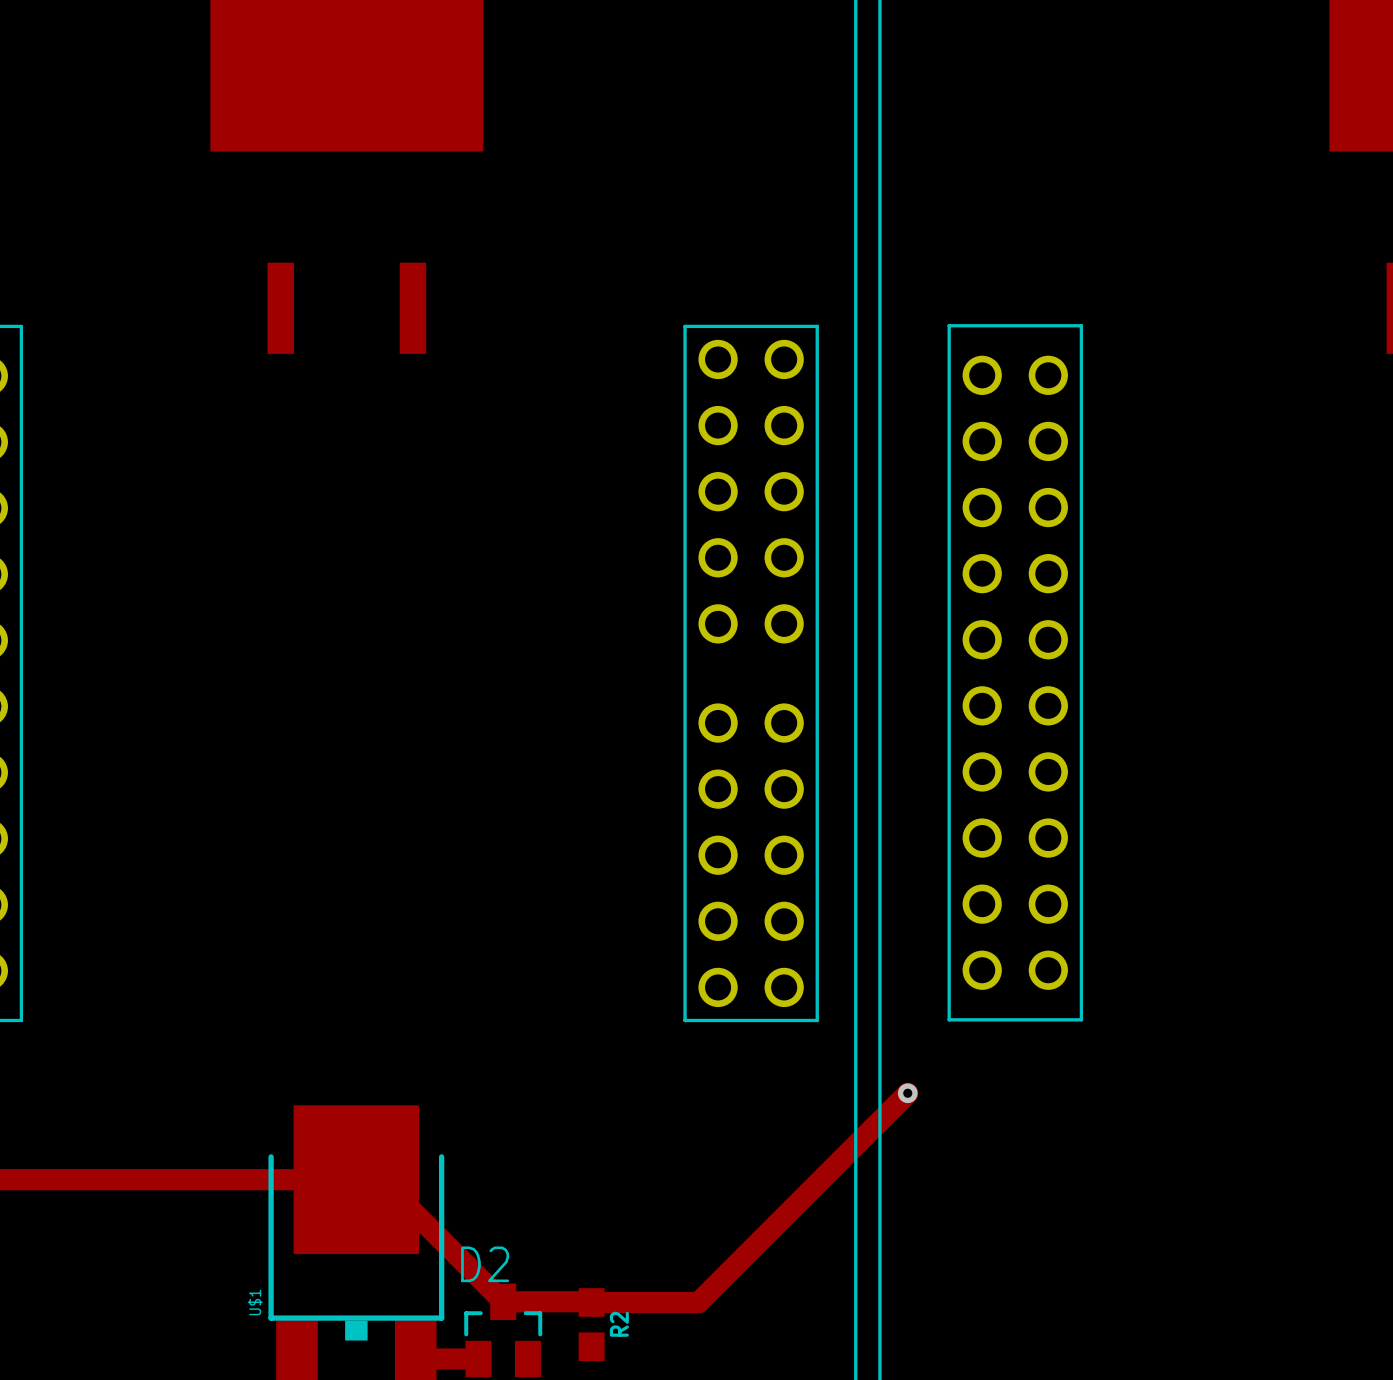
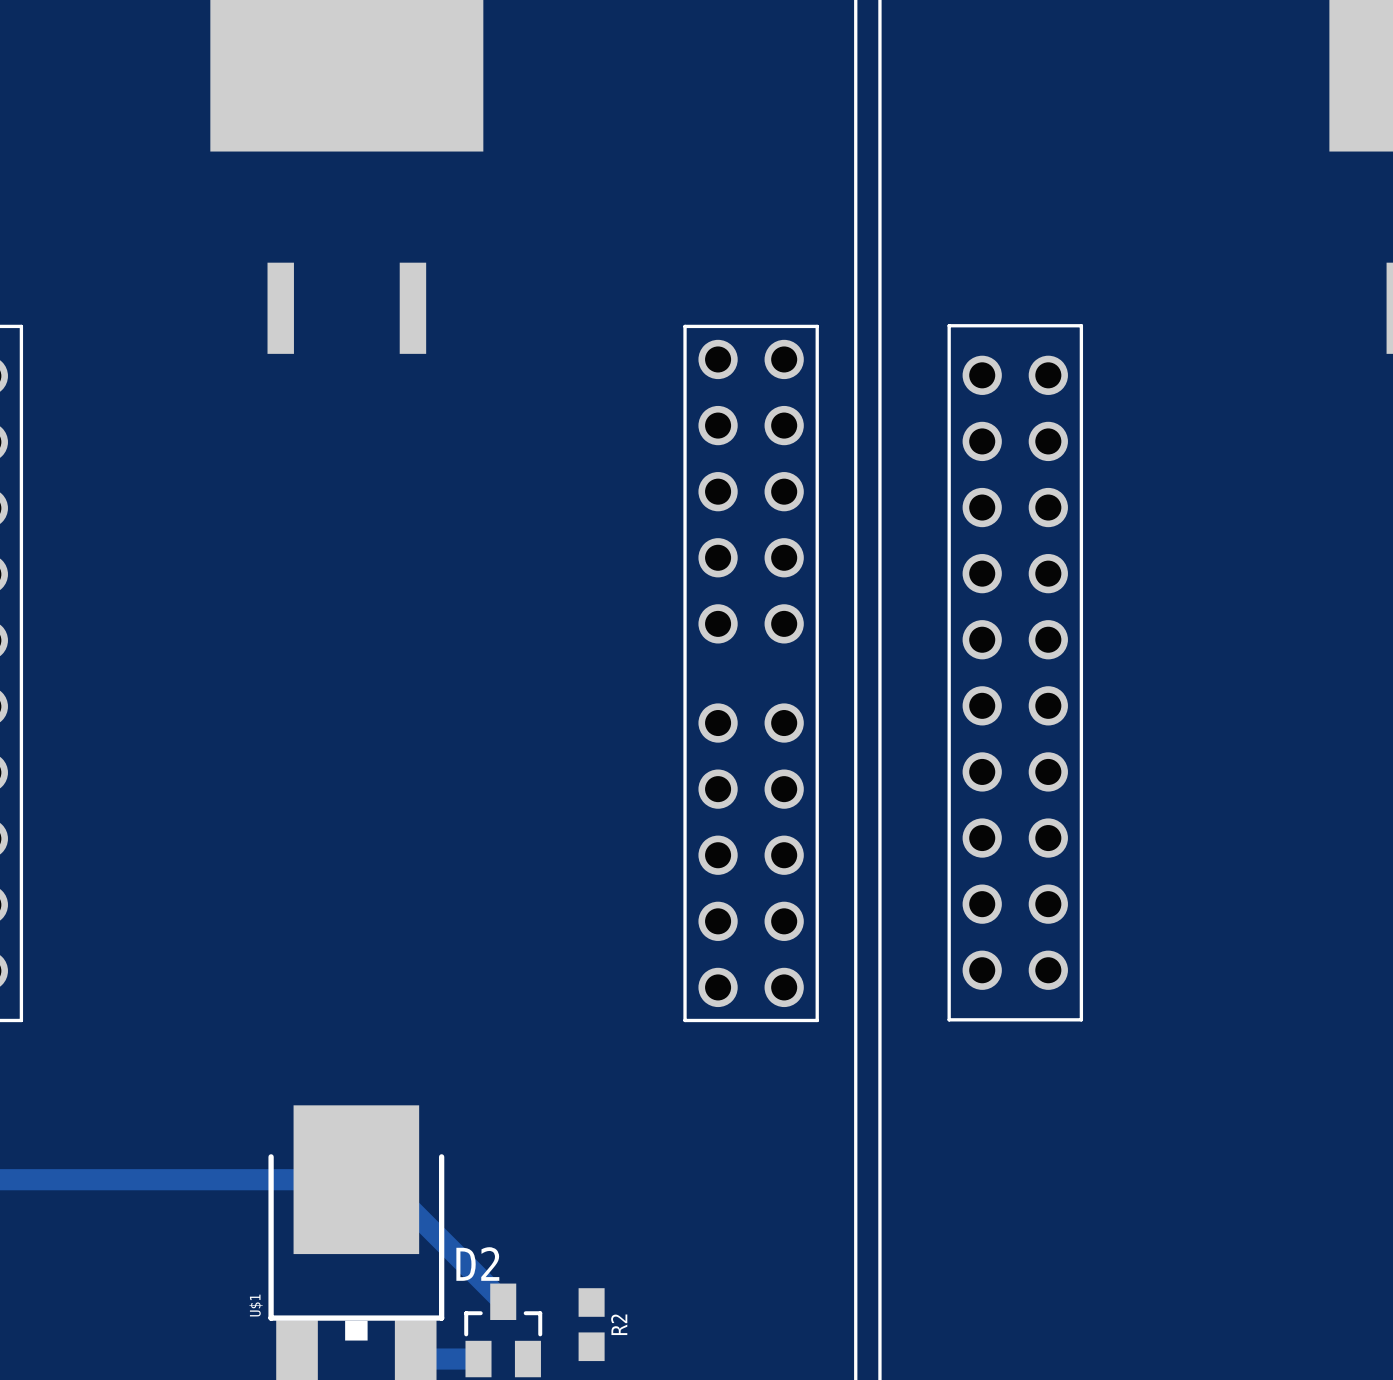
track: (907, 1093) (698, 1302) (503, 1301) -> none
via: (907, 1093) -> none

